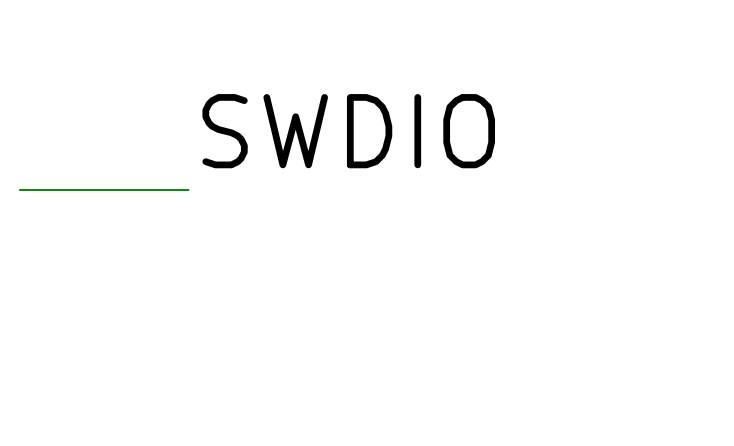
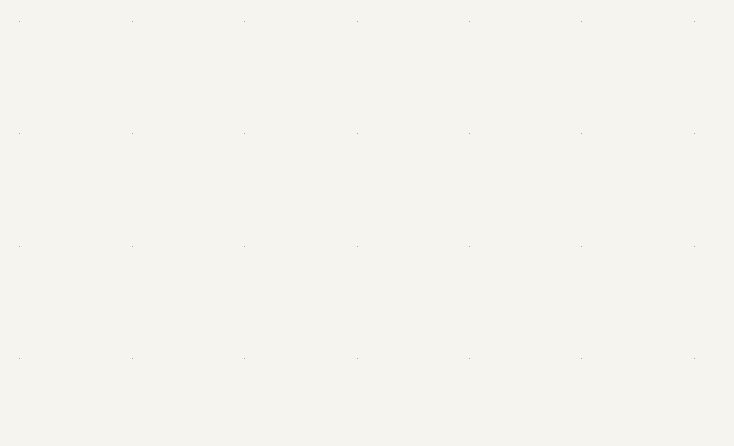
label: SWDIO (348, 131) -> none
wire: (19, 190) (188, 190) -> none

